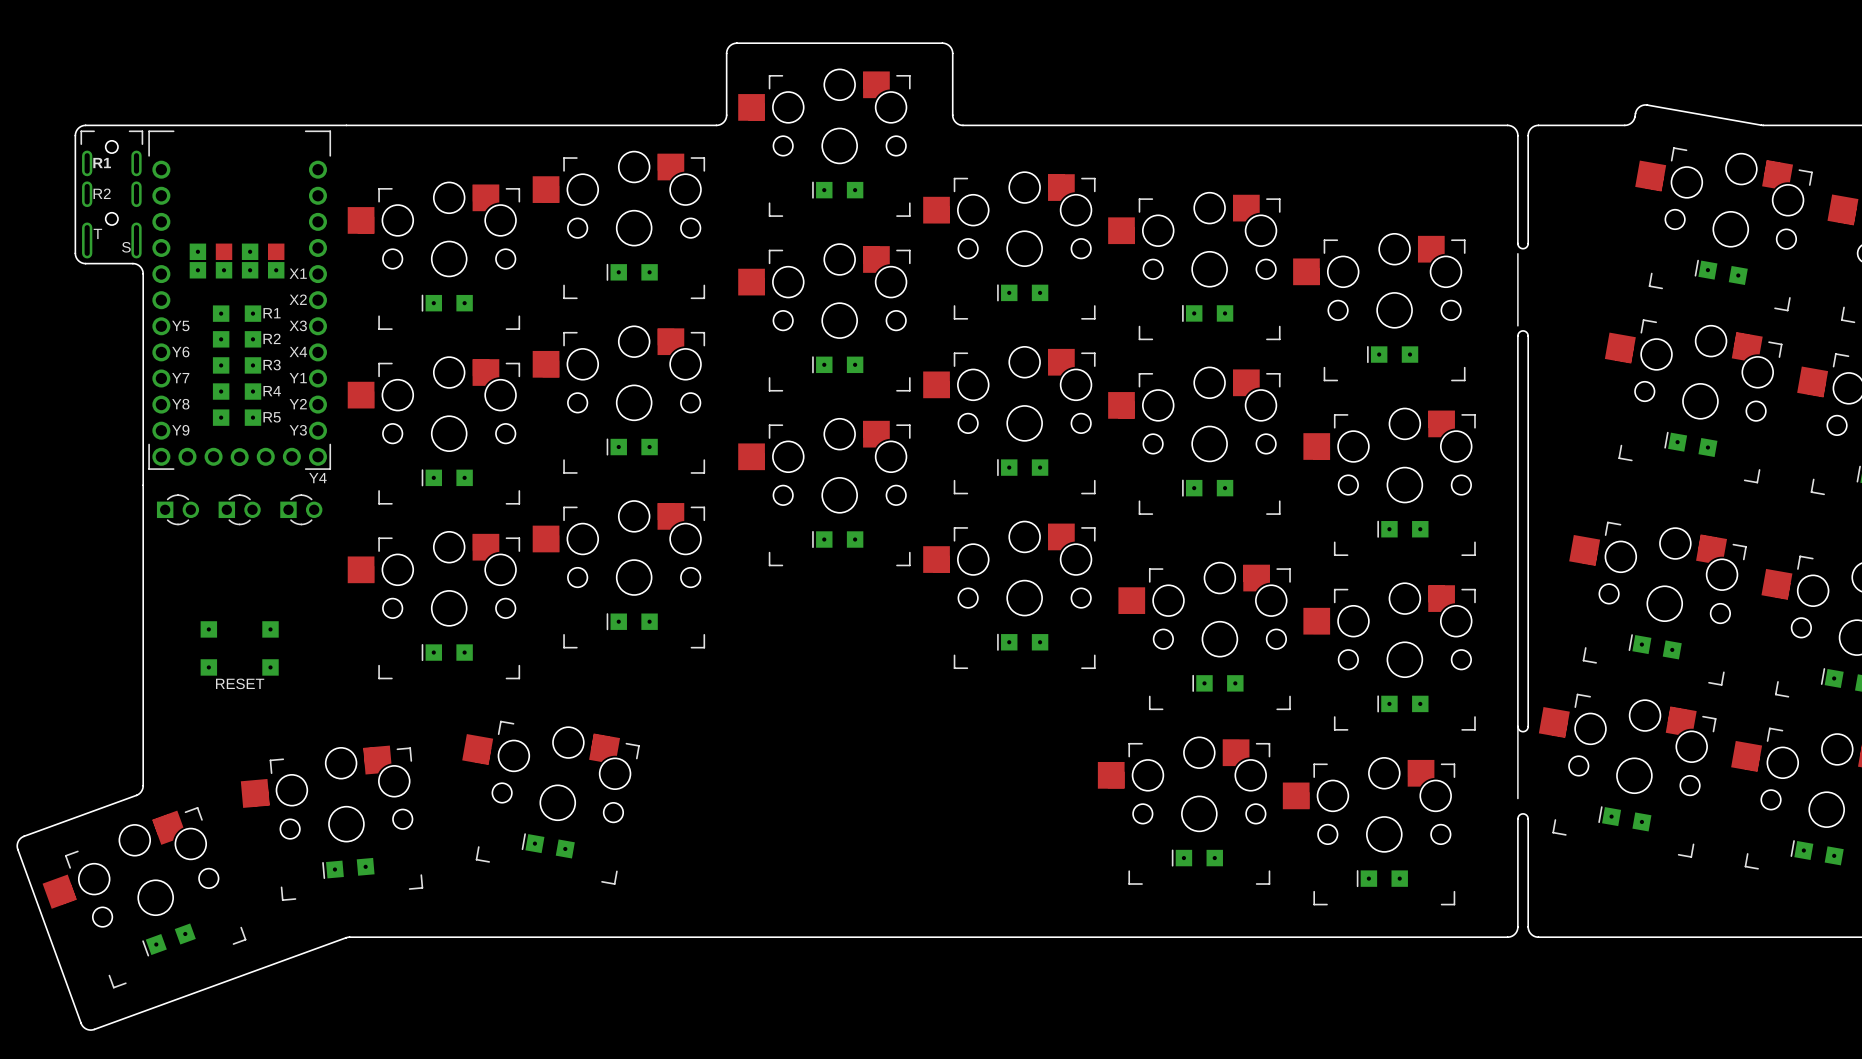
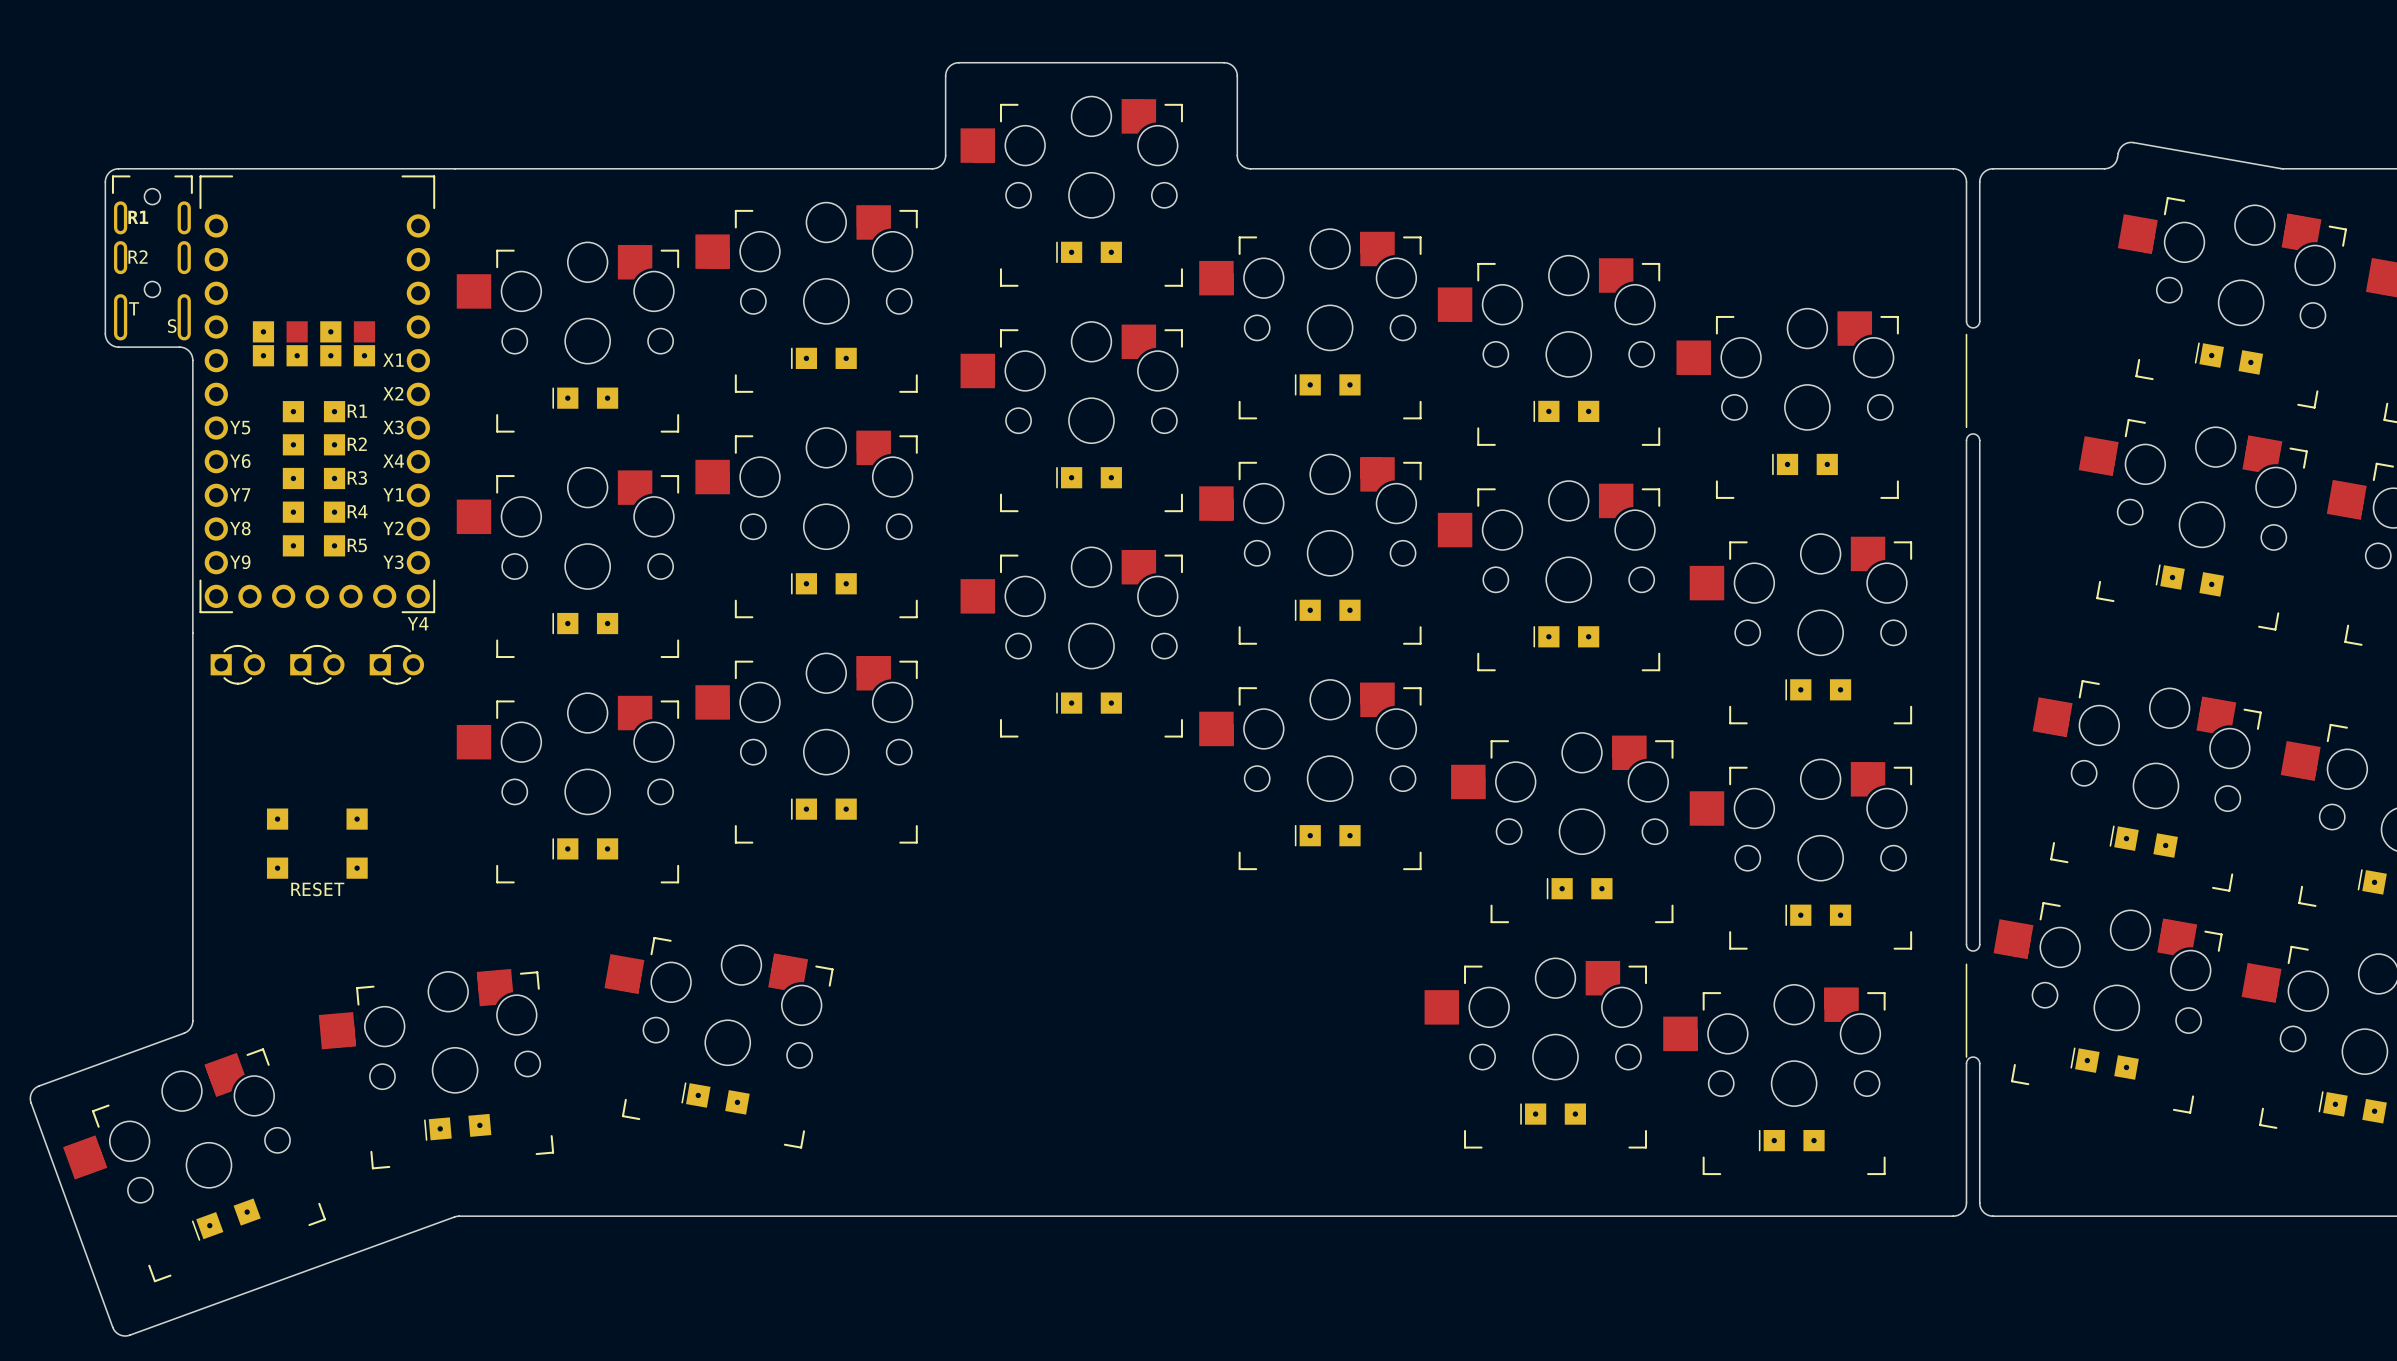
line: (1517, 726) (1517, 741) -> (1966, 1037) (1966, 1057)

